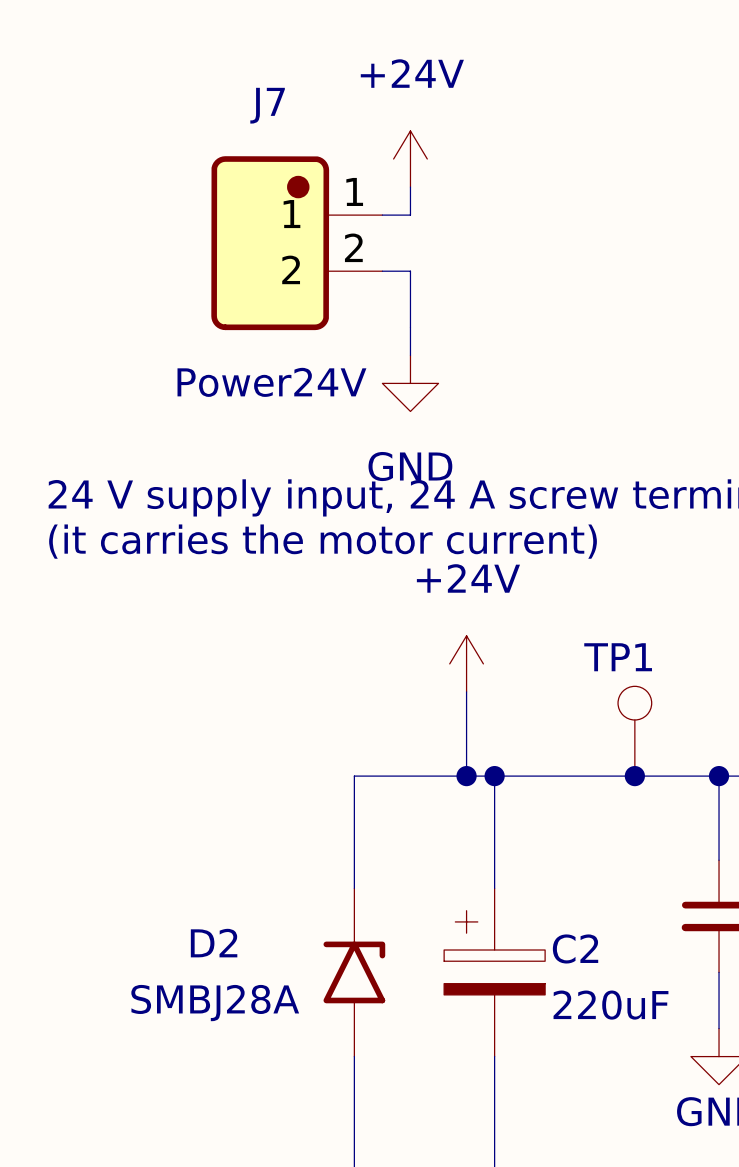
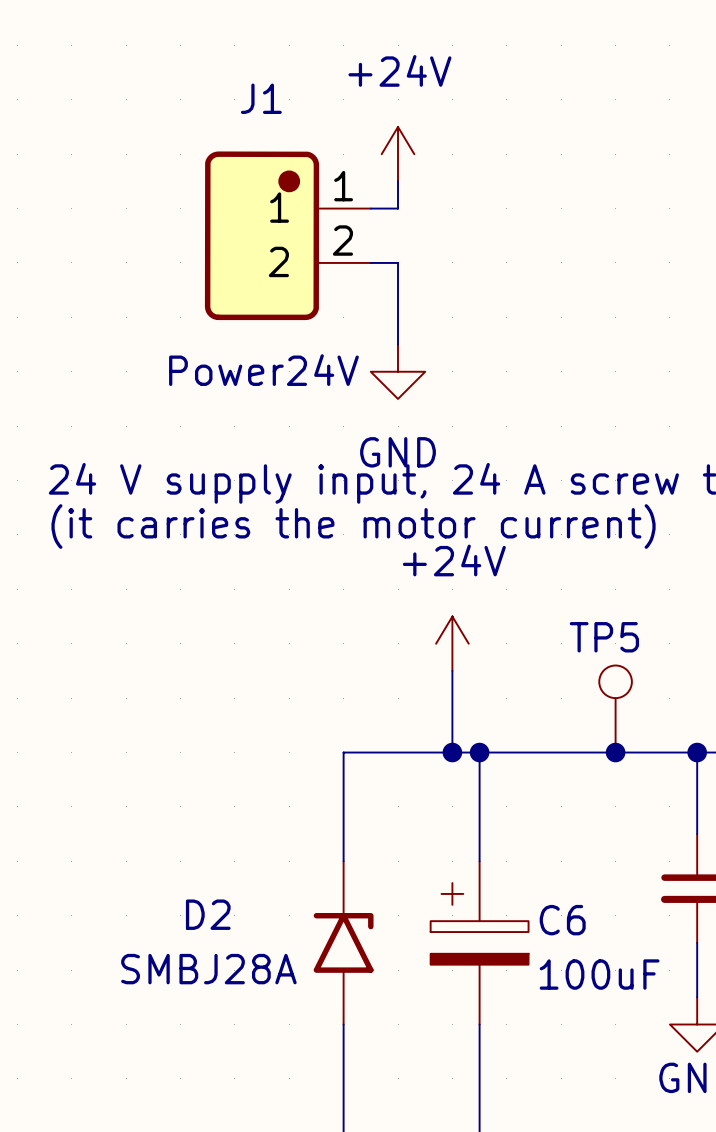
J7 name: J7 (267, 105) -> J1 (261, 98)
TP1 name: TP1 (618, 657) -> TP5 (604, 637)
C2 name: C2 (575, 948) -> C6 (562, 920)
C2 value: 220uF (610, 1005) -> 100uF (599, 974)

